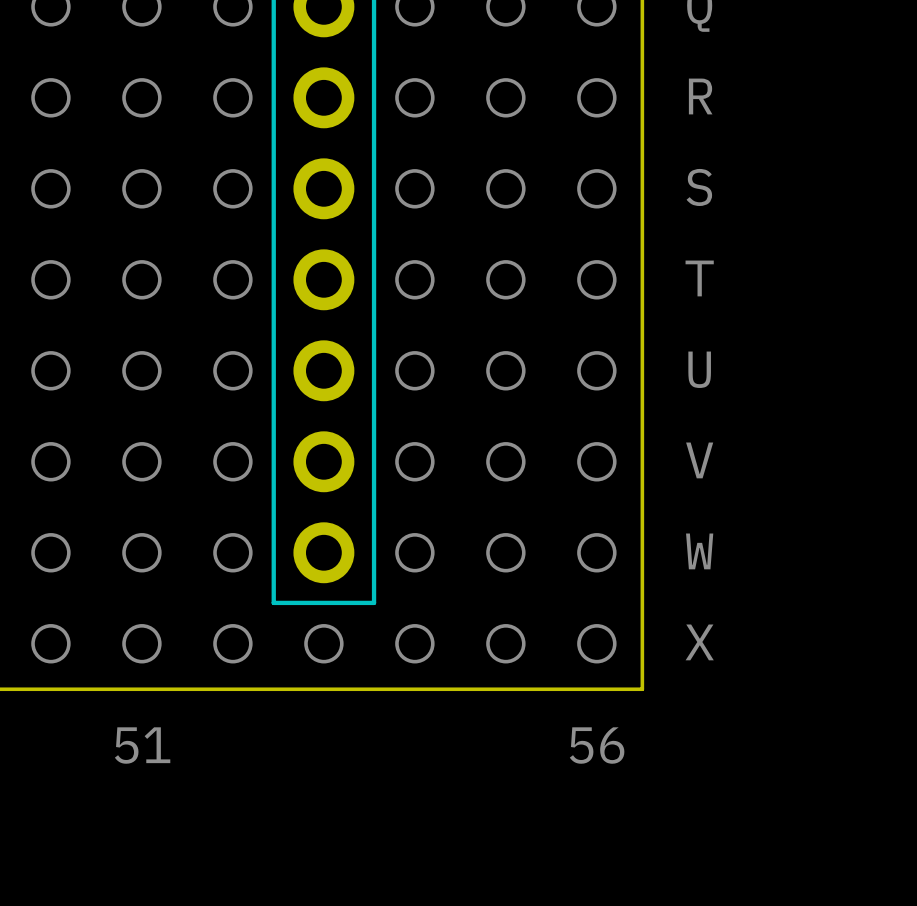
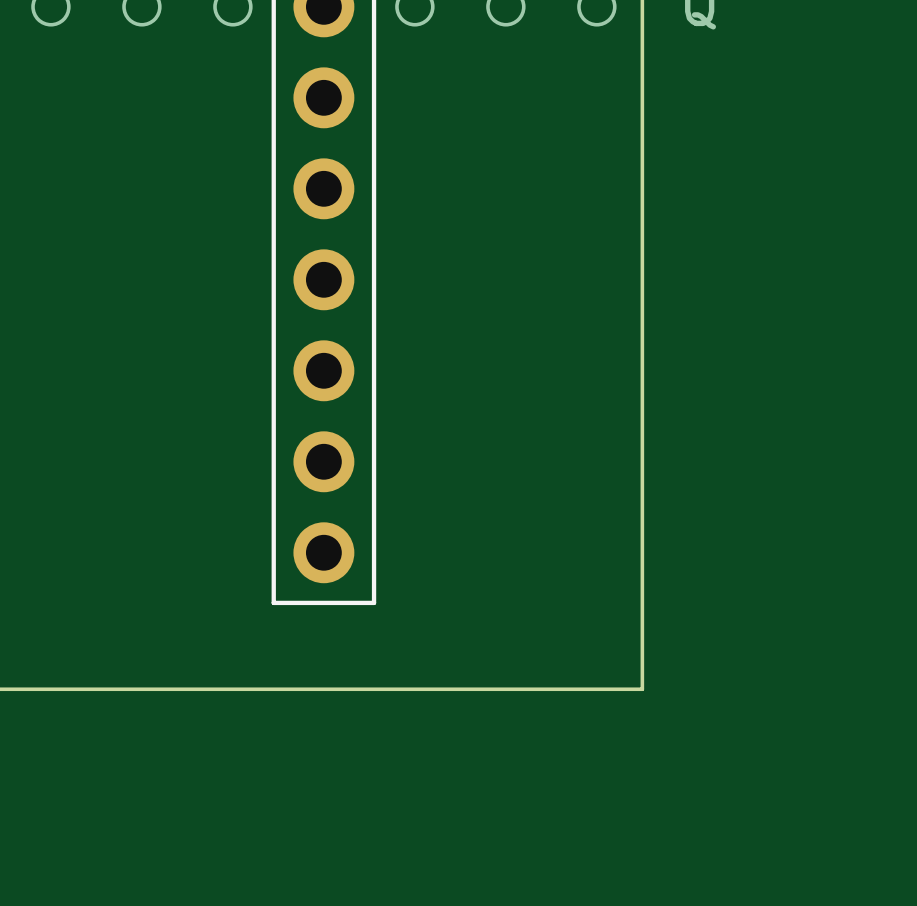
drawing: [31, 78, 71, 118] -> none
drawing: [122, 78, 162, 118] -> none
drawing: [213, 78, 253, 118] -> none
drawing: [395, 78, 435, 118] -> none
drawing: [486, 78, 526, 118] -> none
drawing: [577, 78, 617, 118] -> none
text: R (700, 96) -> none
drawing: [31, 169, 71, 209] -> none
drawing: [122, 169, 162, 209] -> none
drawing: [213, 169, 253, 209] -> none
drawing: [395, 169, 435, 209] -> none
drawing: [486, 169, 526, 209] -> none
drawing: [577, 169, 617, 209] -> none
text: S (699, 187) -> none
drawing: [31, 260, 71, 300] -> none
drawing: [122, 260, 162, 300] -> none
drawing: [213, 260, 253, 300] -> none
drawing: [395, 260, 435, 300] -> none
drawing: [486, 260, 526, 300] -> none
drawing: [577, 260, 617, 300] -> none
text: T (699, 278) -> none
drawing: [31, 351, 71, 391] -> none
drawing: [122, 351, 162, 391] -> none
drawing: [213, 351, 253, 391] -> none
drawing: [395, 351, 435, 391] -> none
drawing: [486, 351, 526, 391] -> none
drawing: [577, 351, 617, 391] -> none
text: U (699, 369) -> none
drawing: [31, 442, 71, 482] -> none
drawing: [122, 442, 162, 482] -> none
drawing: [213, 442, 253, 482] -> none
drawing: [395, 442, 435, 482] -> none
drawing: [486, 442, 526, 482] -> none
drawing: [577, 442, 617, 482] -> none
text: V (699, 460) -> none
drawing: [31, 533, 71, 573] -> none
drawing: [122, 533, 162, 573] -> none
drawing: [213, 533, 253, 573] -> none
drawing: [395, 533, 435, 573] -> none
drawing: [486, 533, 526, 573] -> none
drawing: [577, 533, 617, 573] -> none
text: W (699, 551) -> none
drawing: [31, 624, 71, 664] -> none
drawing: [122, 624, 162, 664] -> none
drawing: [213, 624, 253, 664] -> none
drawing: [304, 624, 344, 664] -> none
drawing: [395, 624, 435, 664] -> none
drawing: [486, 624, 526, 664] -> none
drawing: [577, 624, 617, 664] -> none
text: X (699, 642) -> none
text: 51 (142, 745) -> none
text: 56 (597, 745) -> none

